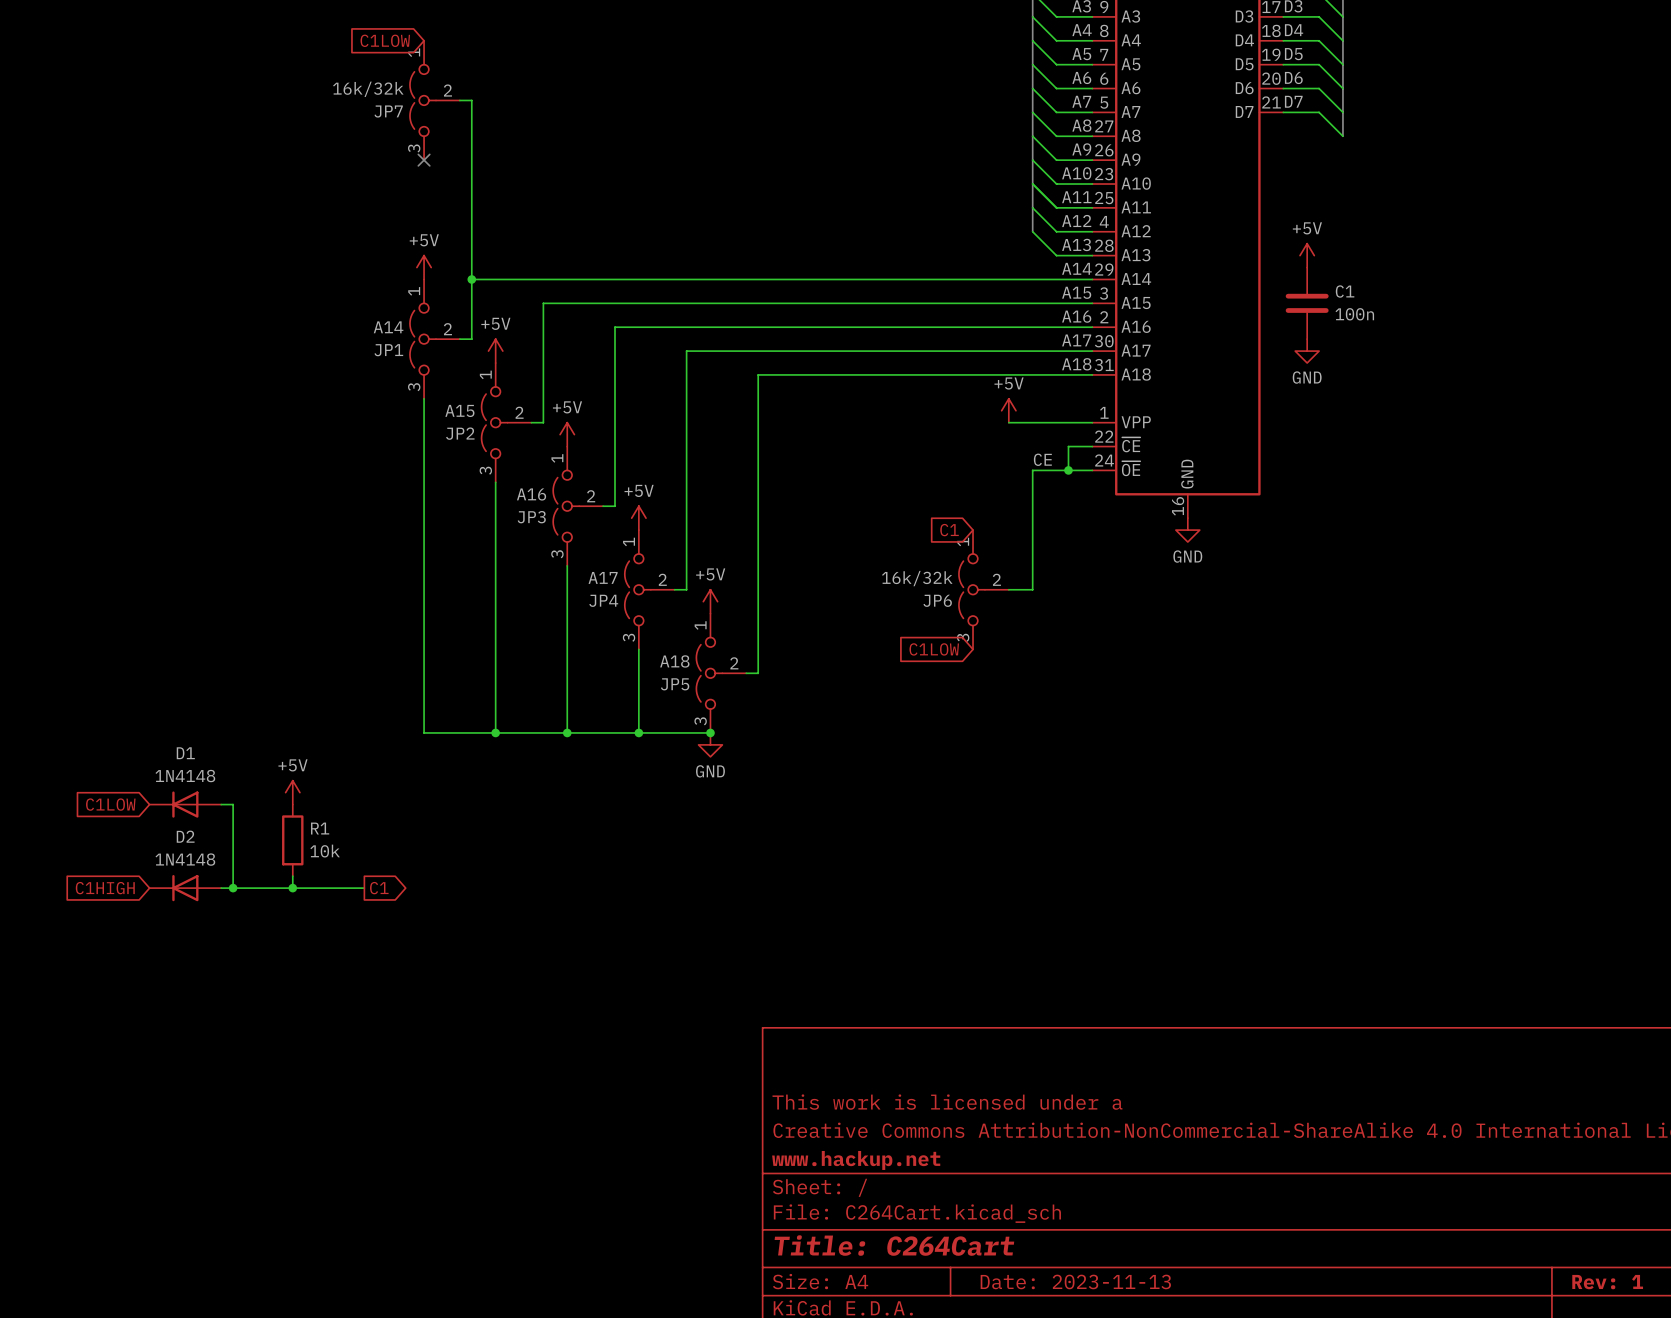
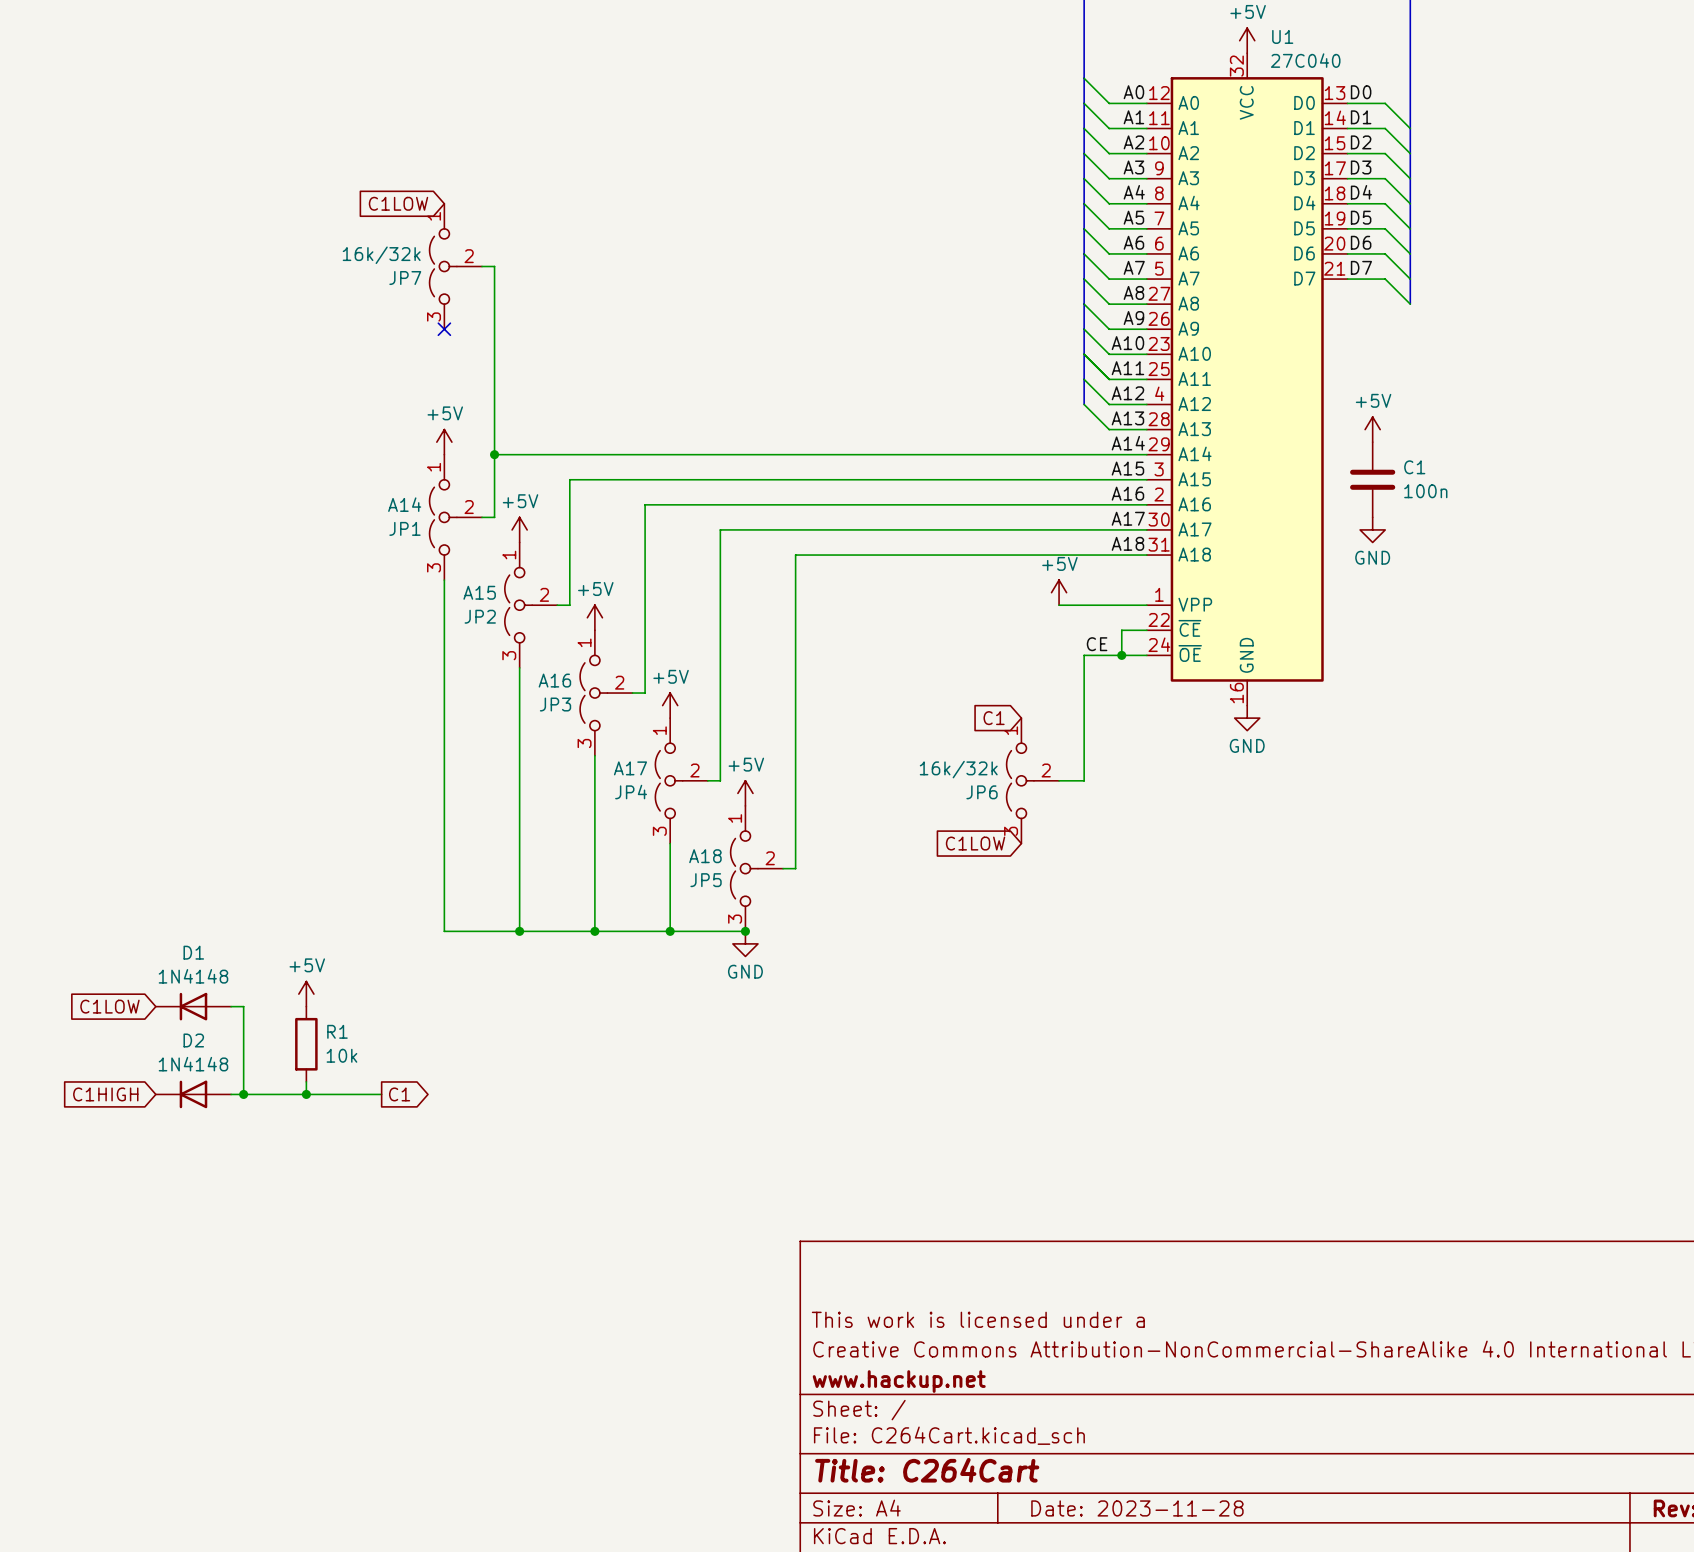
title block: Date: 2023-11-13 (1075, 1281) -> Date: 2023-11-28 (1137, 1508)

